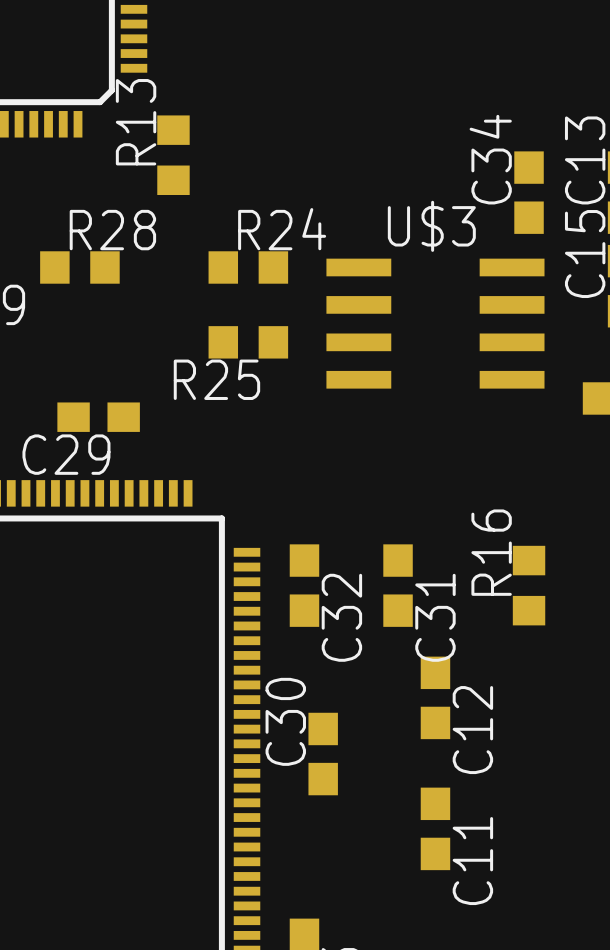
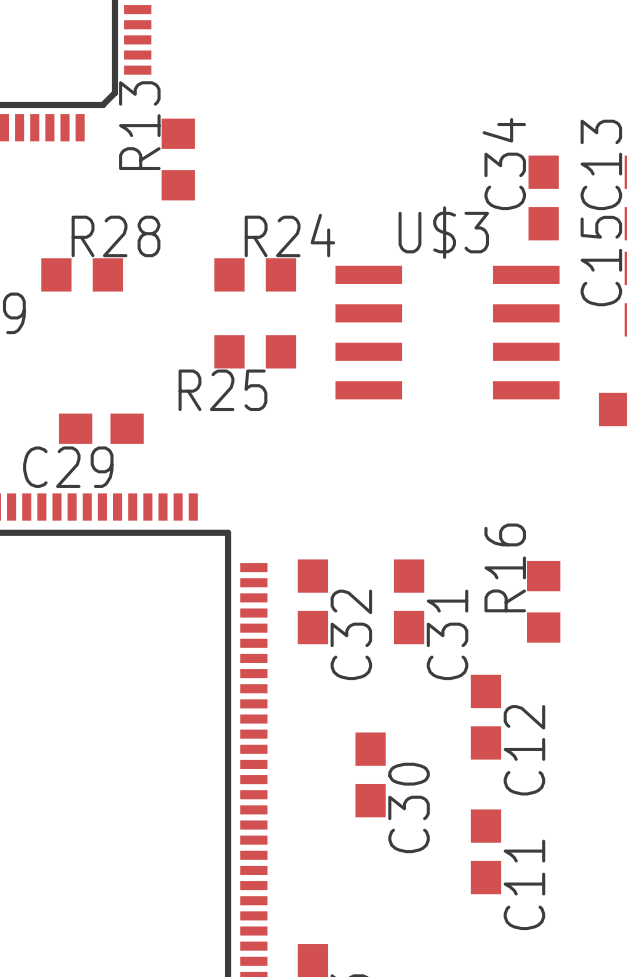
C12 position: (435, 697) -> (485, 717)
C30 name position: C30 (285, 721) -> C30 (409, 807)
C30 position: (323, 754) -> (370, 774)
C11 position: (435, 828) -> (485, 851)

